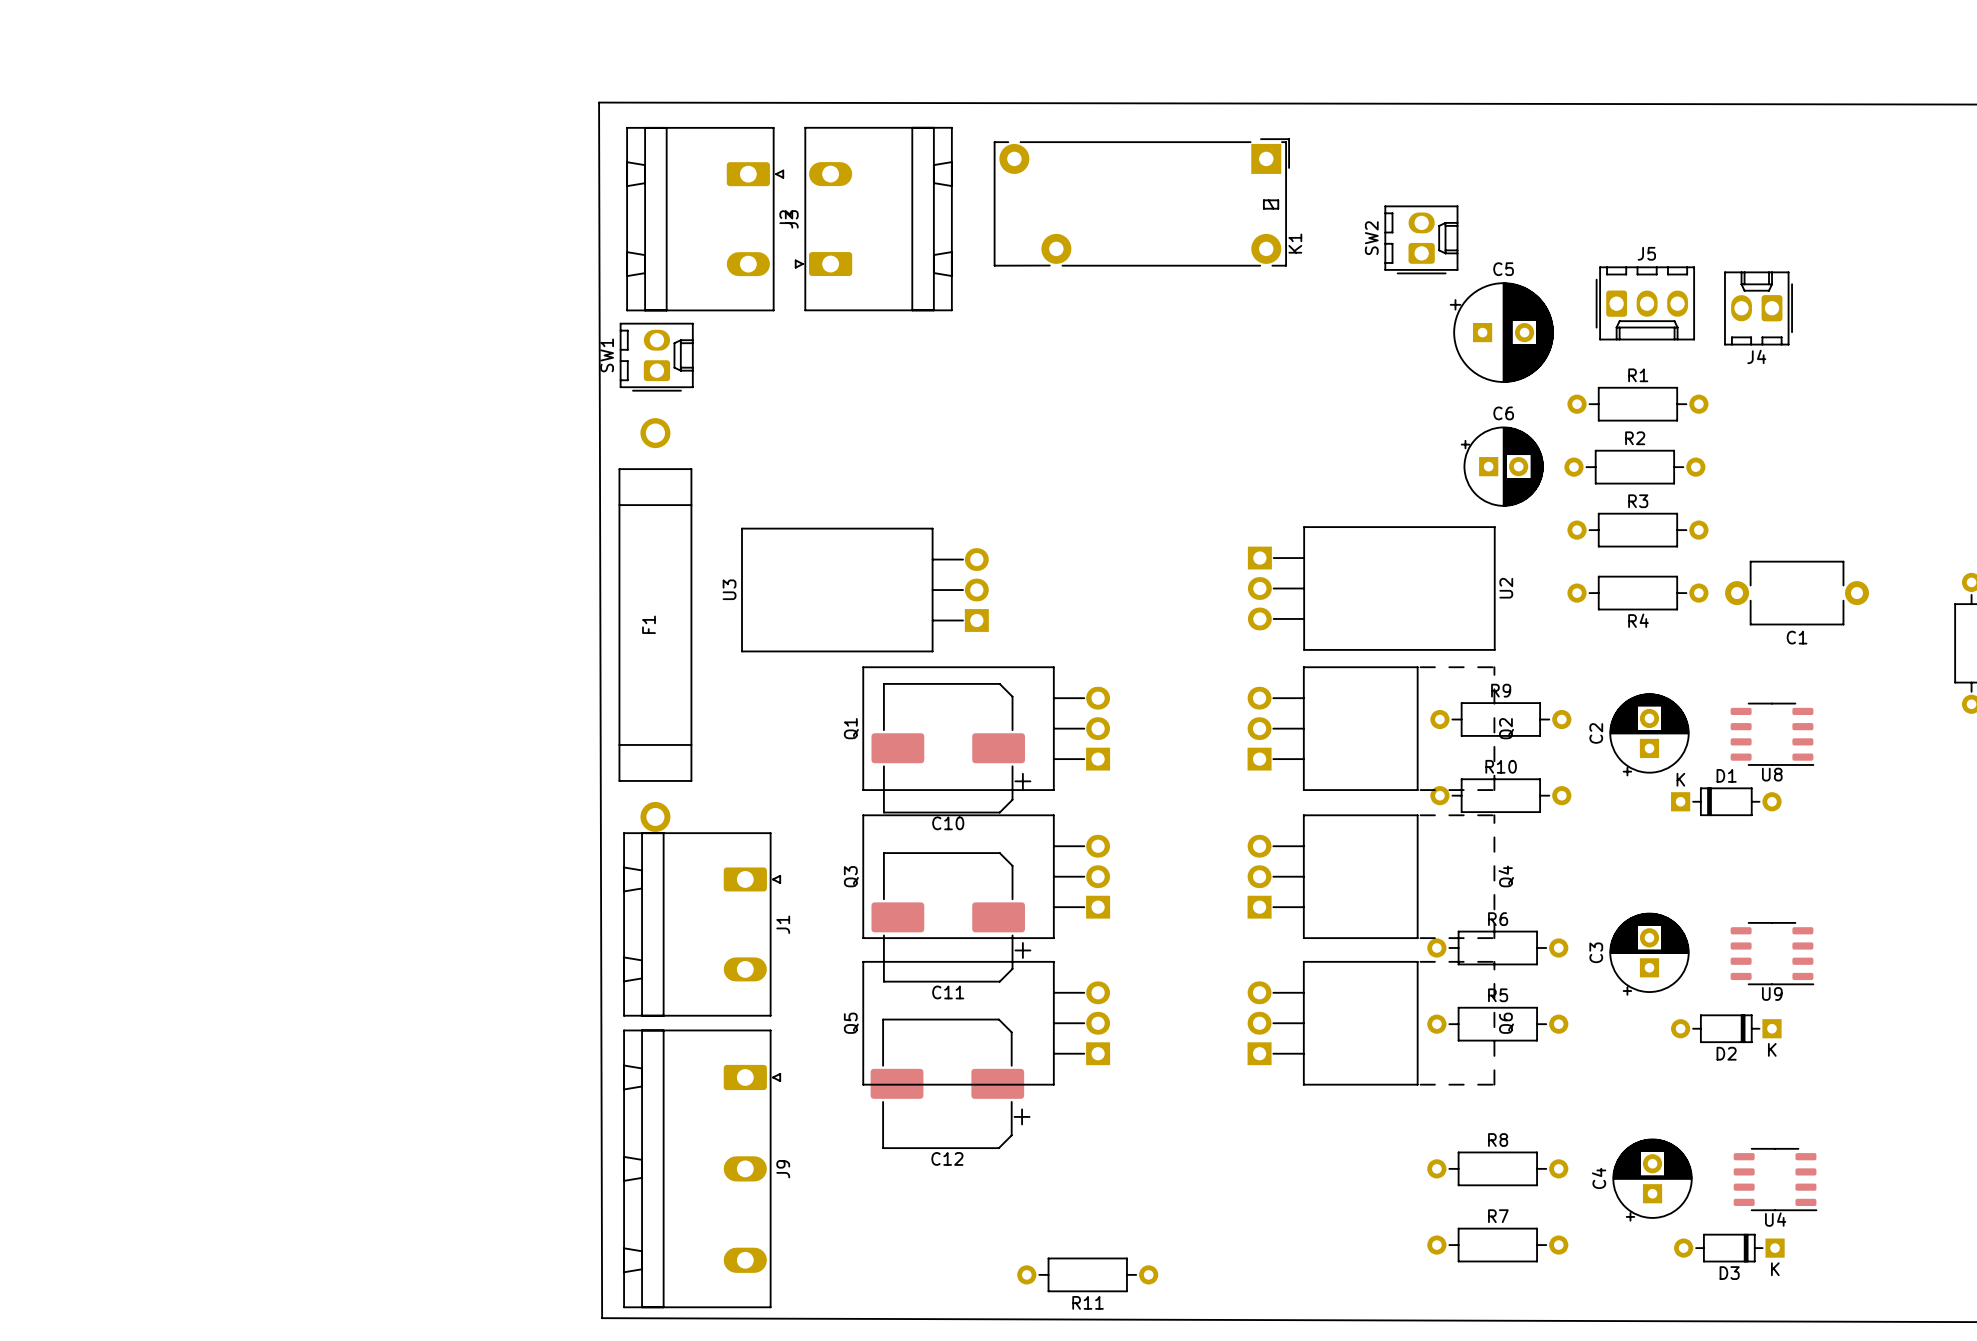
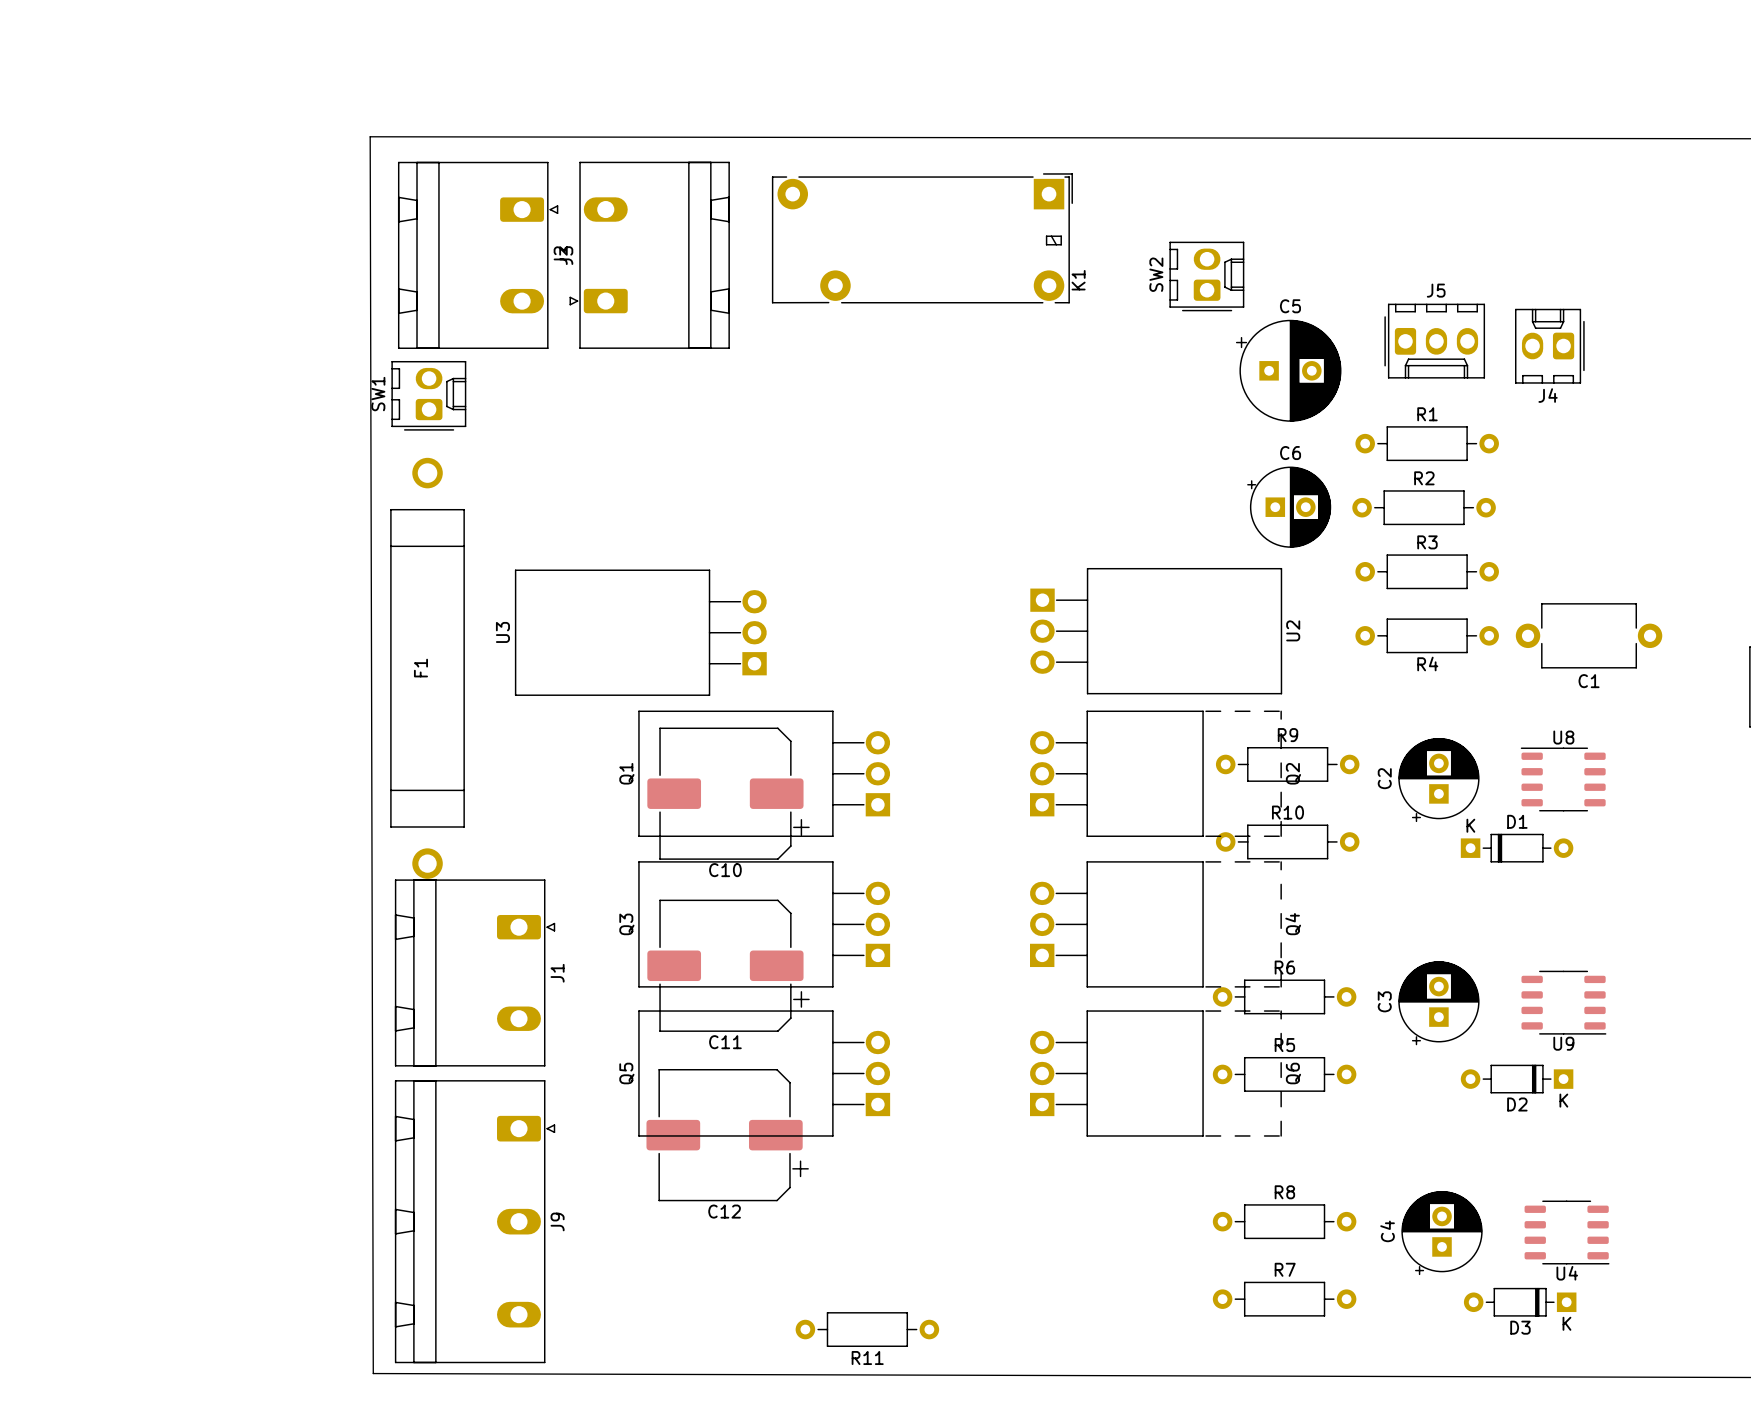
U8 rotation: 0° (1772, 734) -> 180° (1563, 779)

